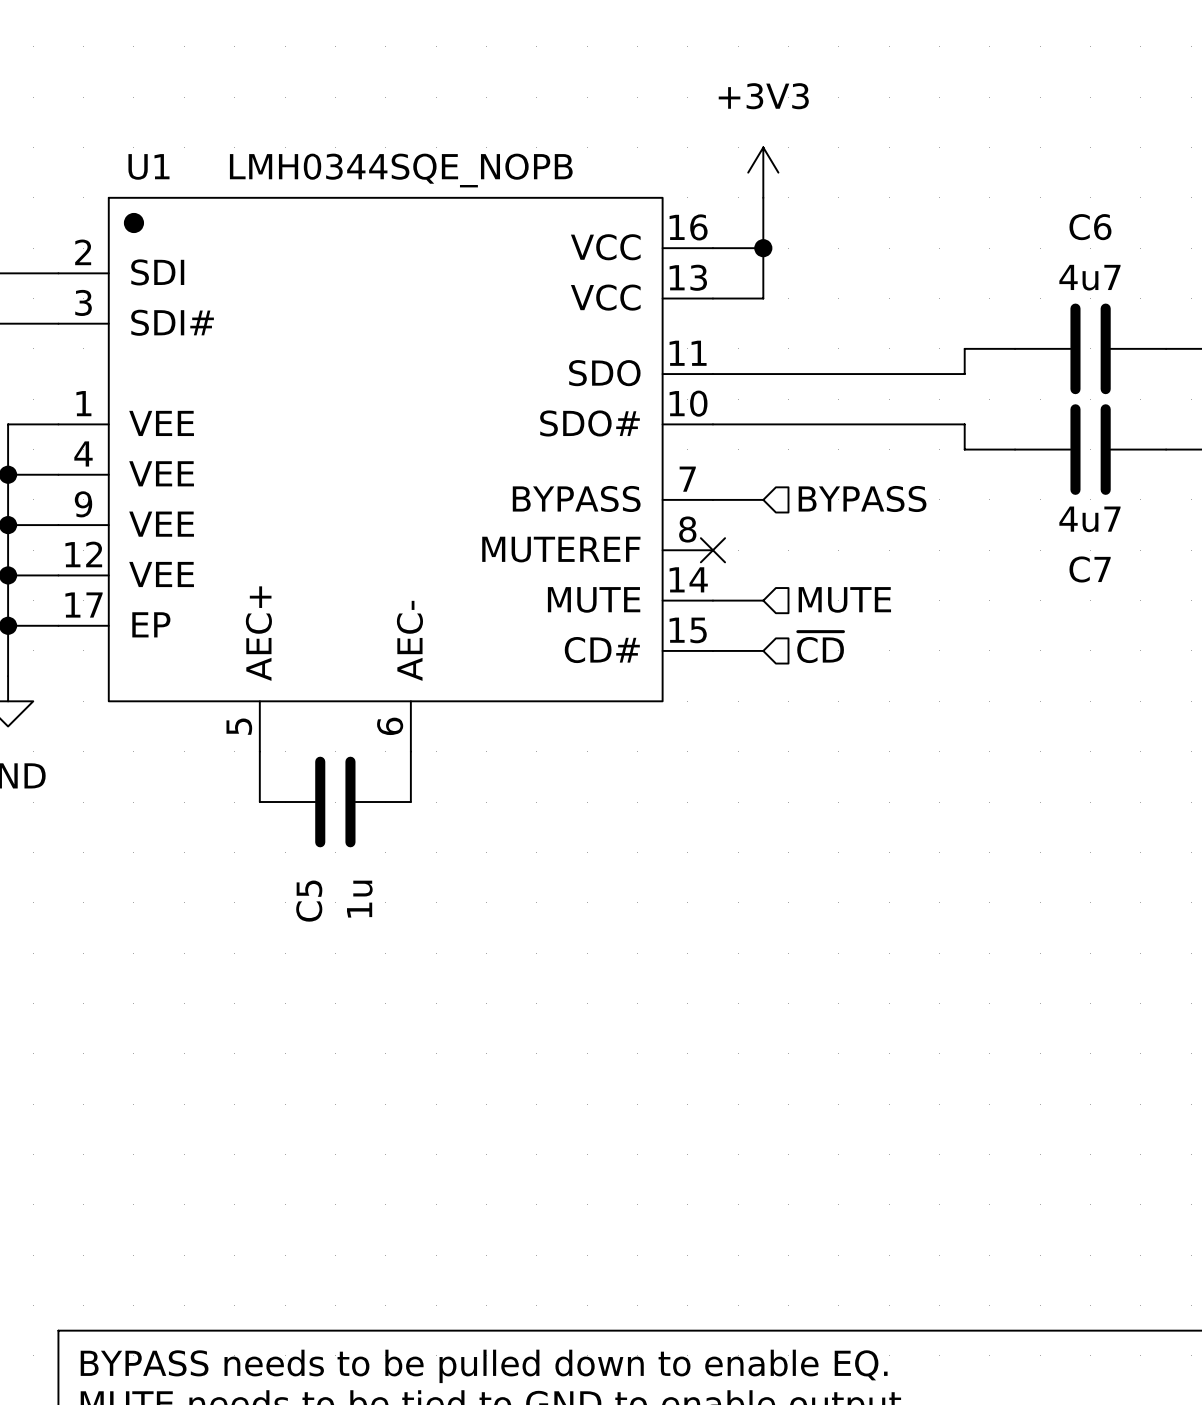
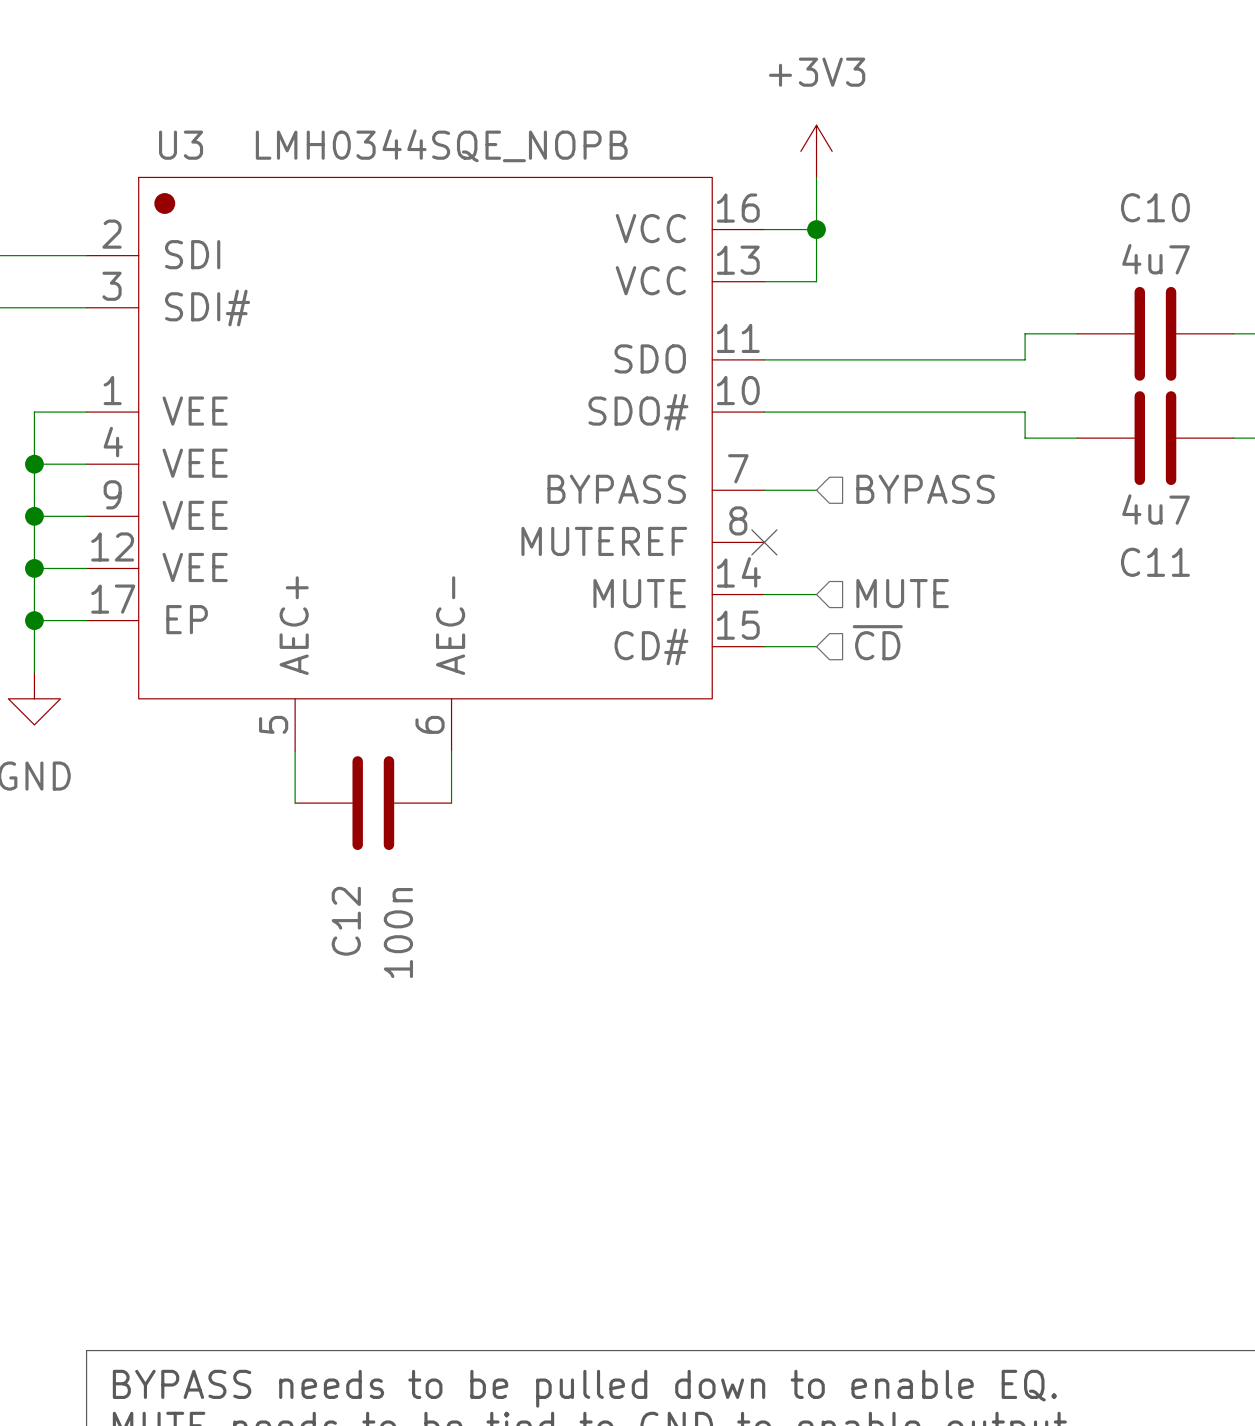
U1 name: U1 (148, 166) -> U3 (181, 145)
C6 name: C6 (1090, 227) -> C10 (1155, 207)
C7 name: C7 (1090, 569) -> C11 (1155, 562)
C5 value: 1u (359, 899) -> 100n (398, 933)
C5 name: C5 (309, 901) -> C12 (346, 921)

